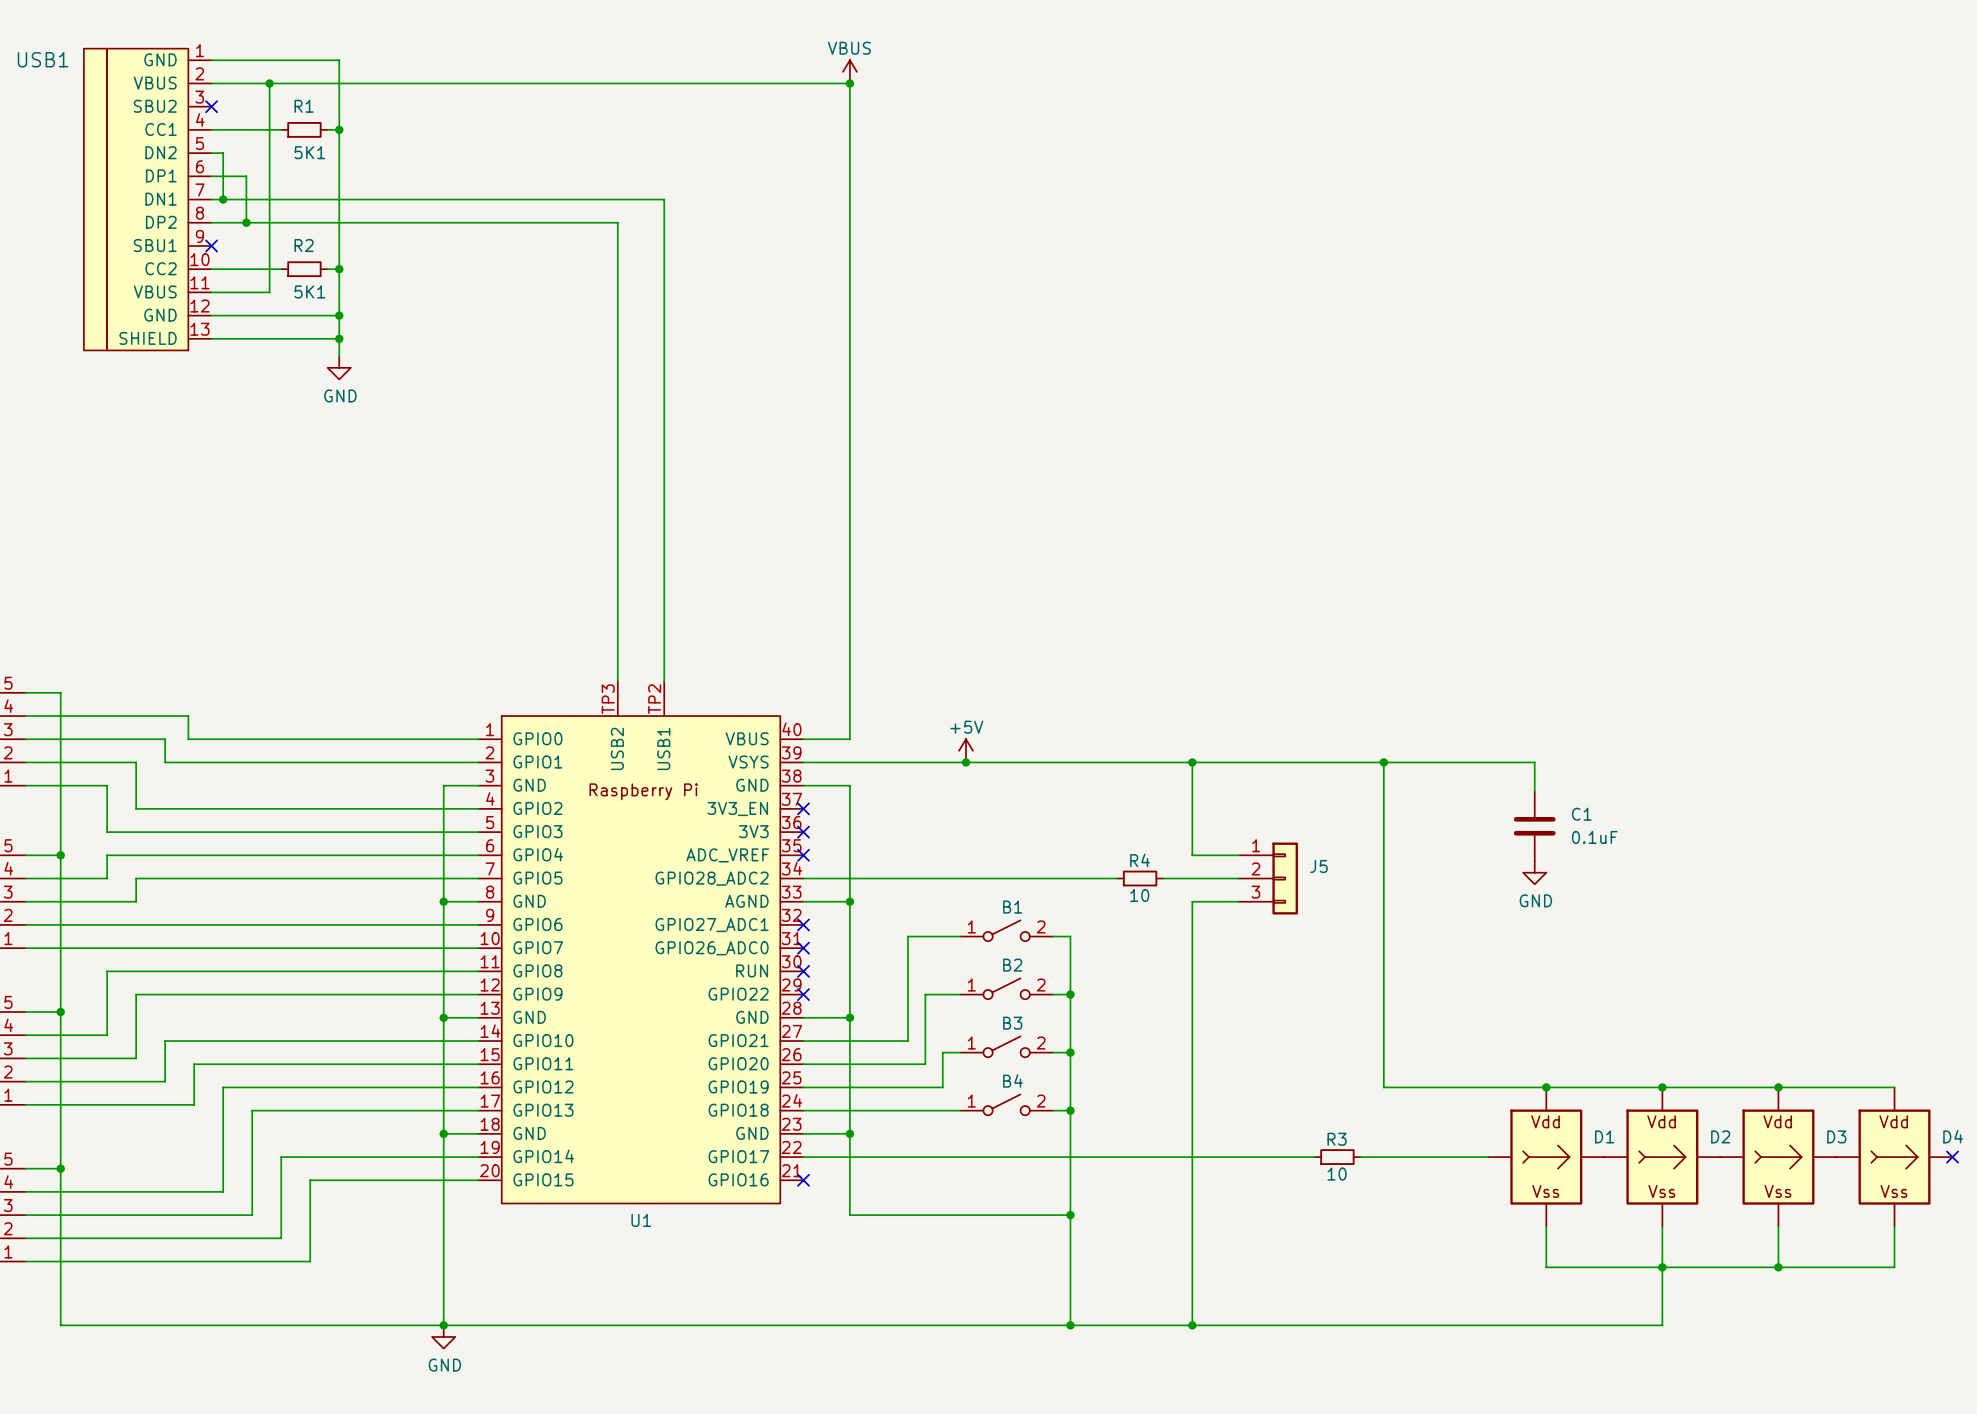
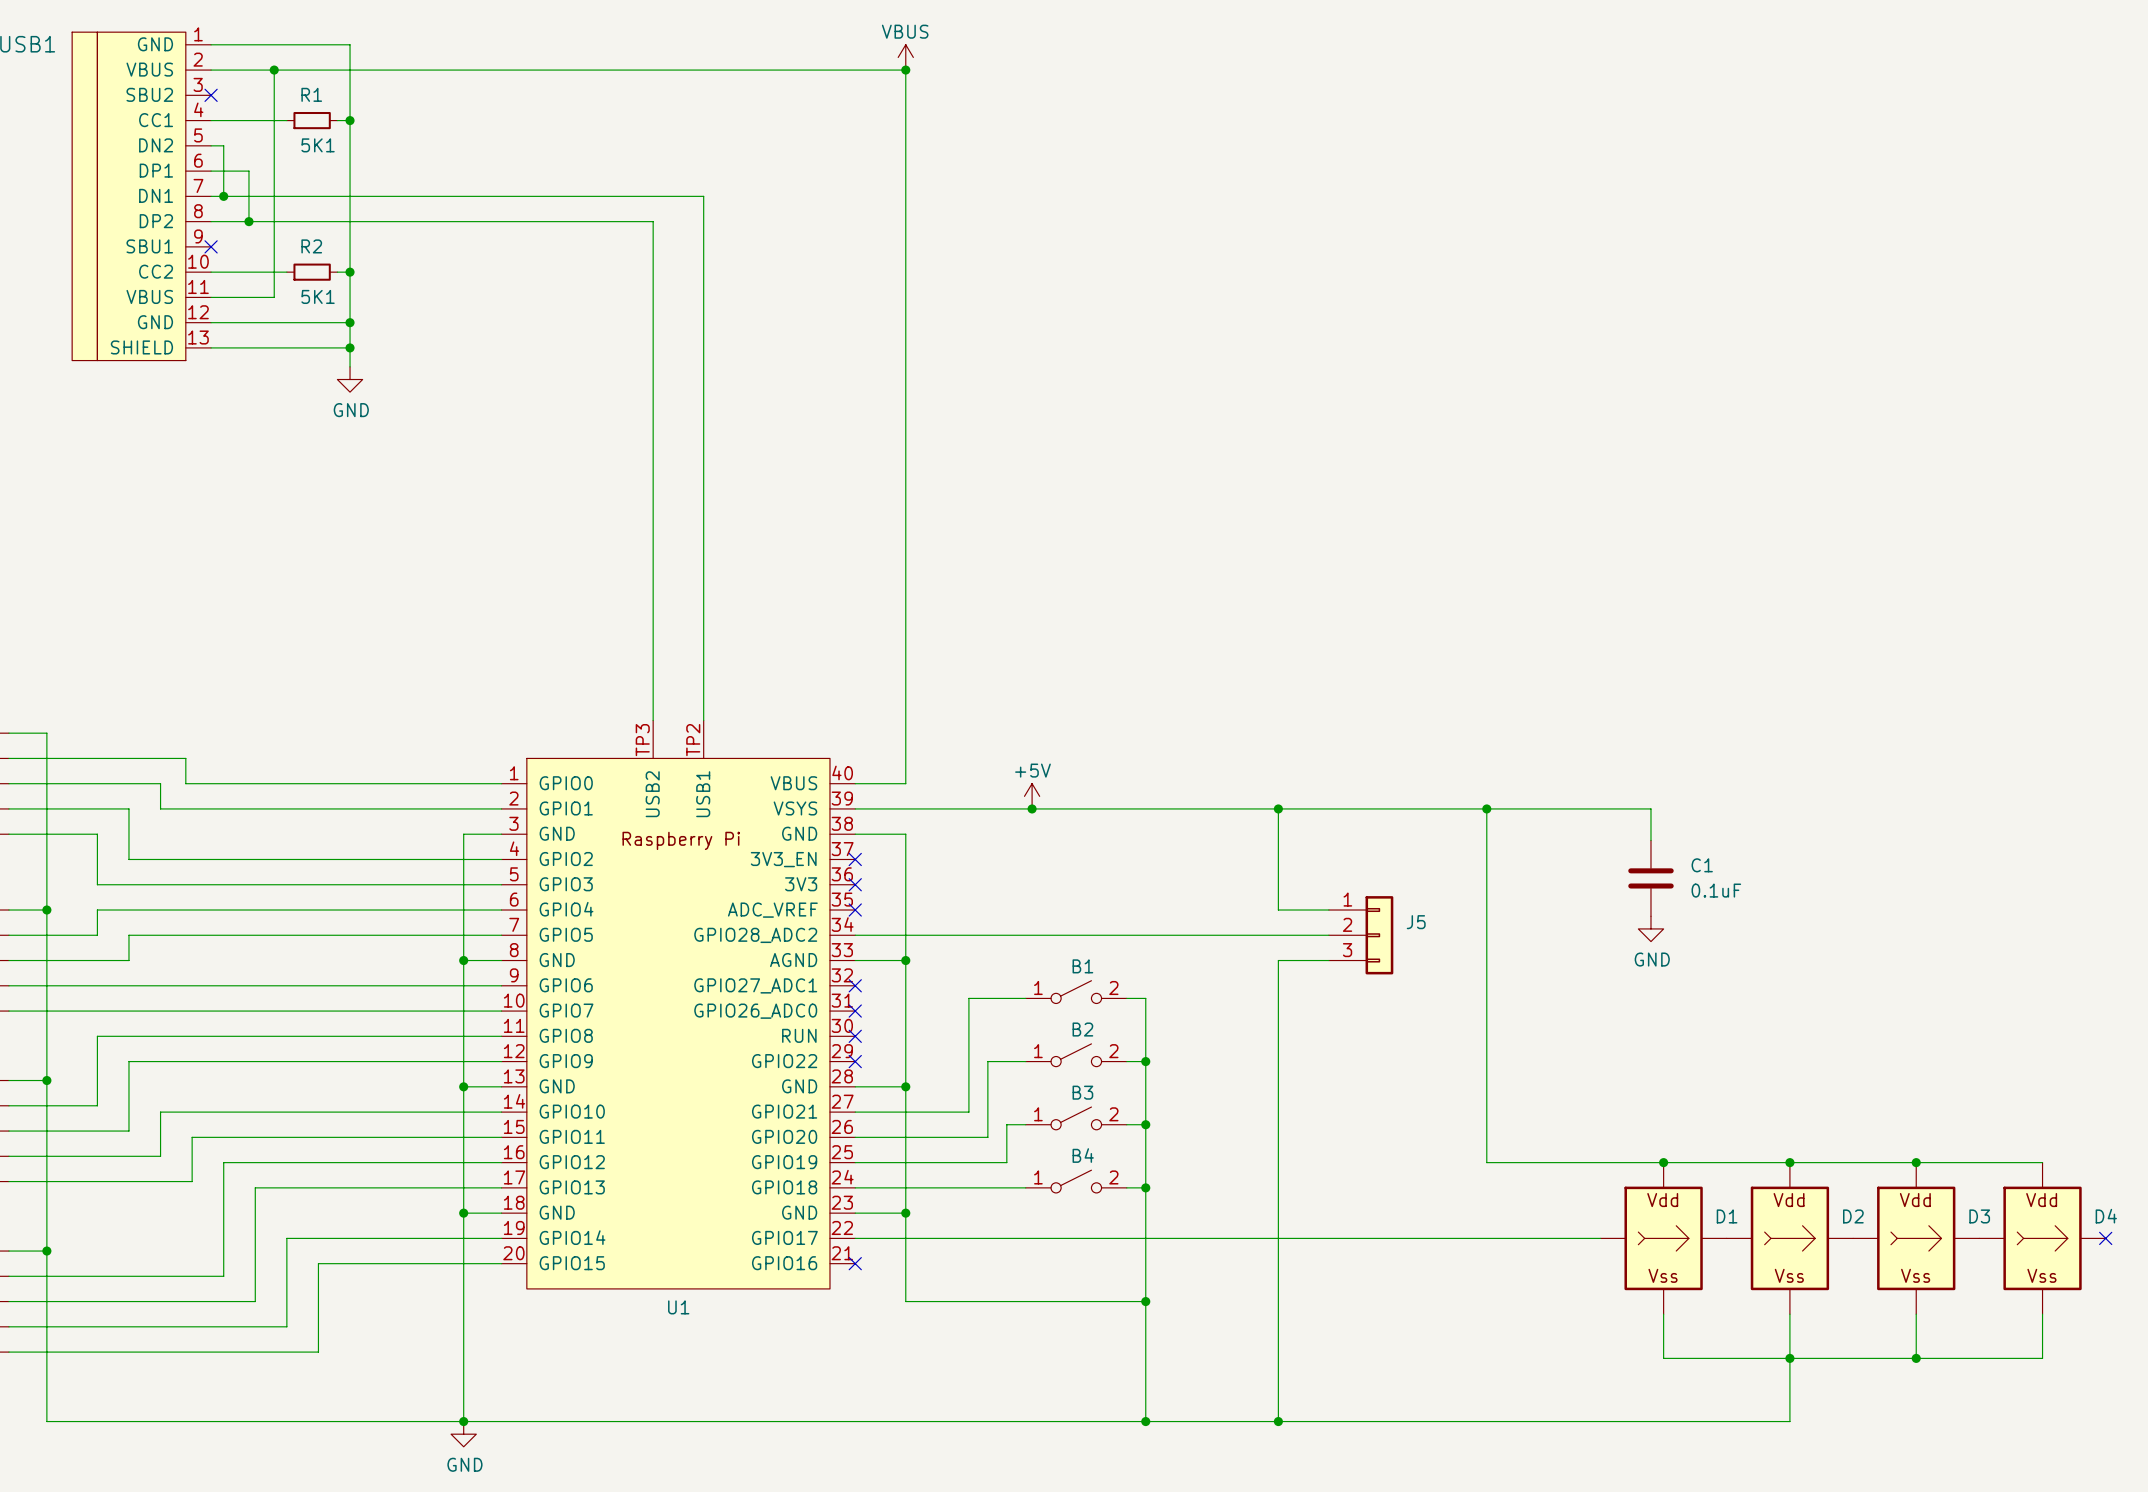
wire: none -> (1196, 935) (1246, 935)
R4: 10 (1140, 878) -> none
wire: none -> (1411, 1238) (1461, 1238)
R3: 10 (1337, 1157) -> none

